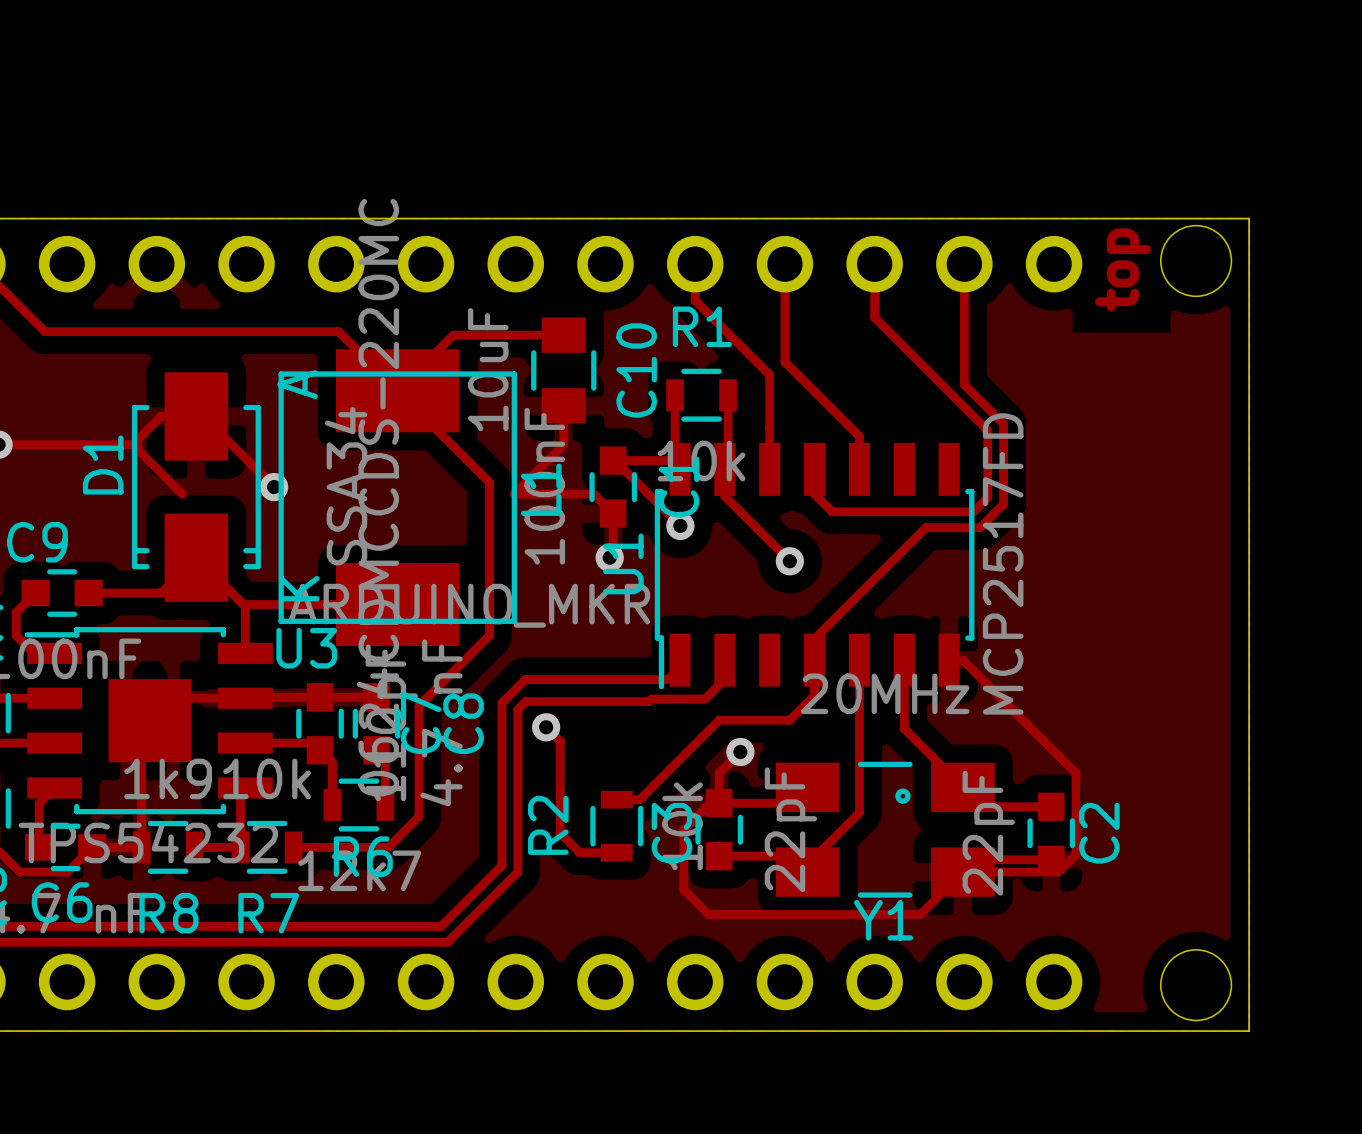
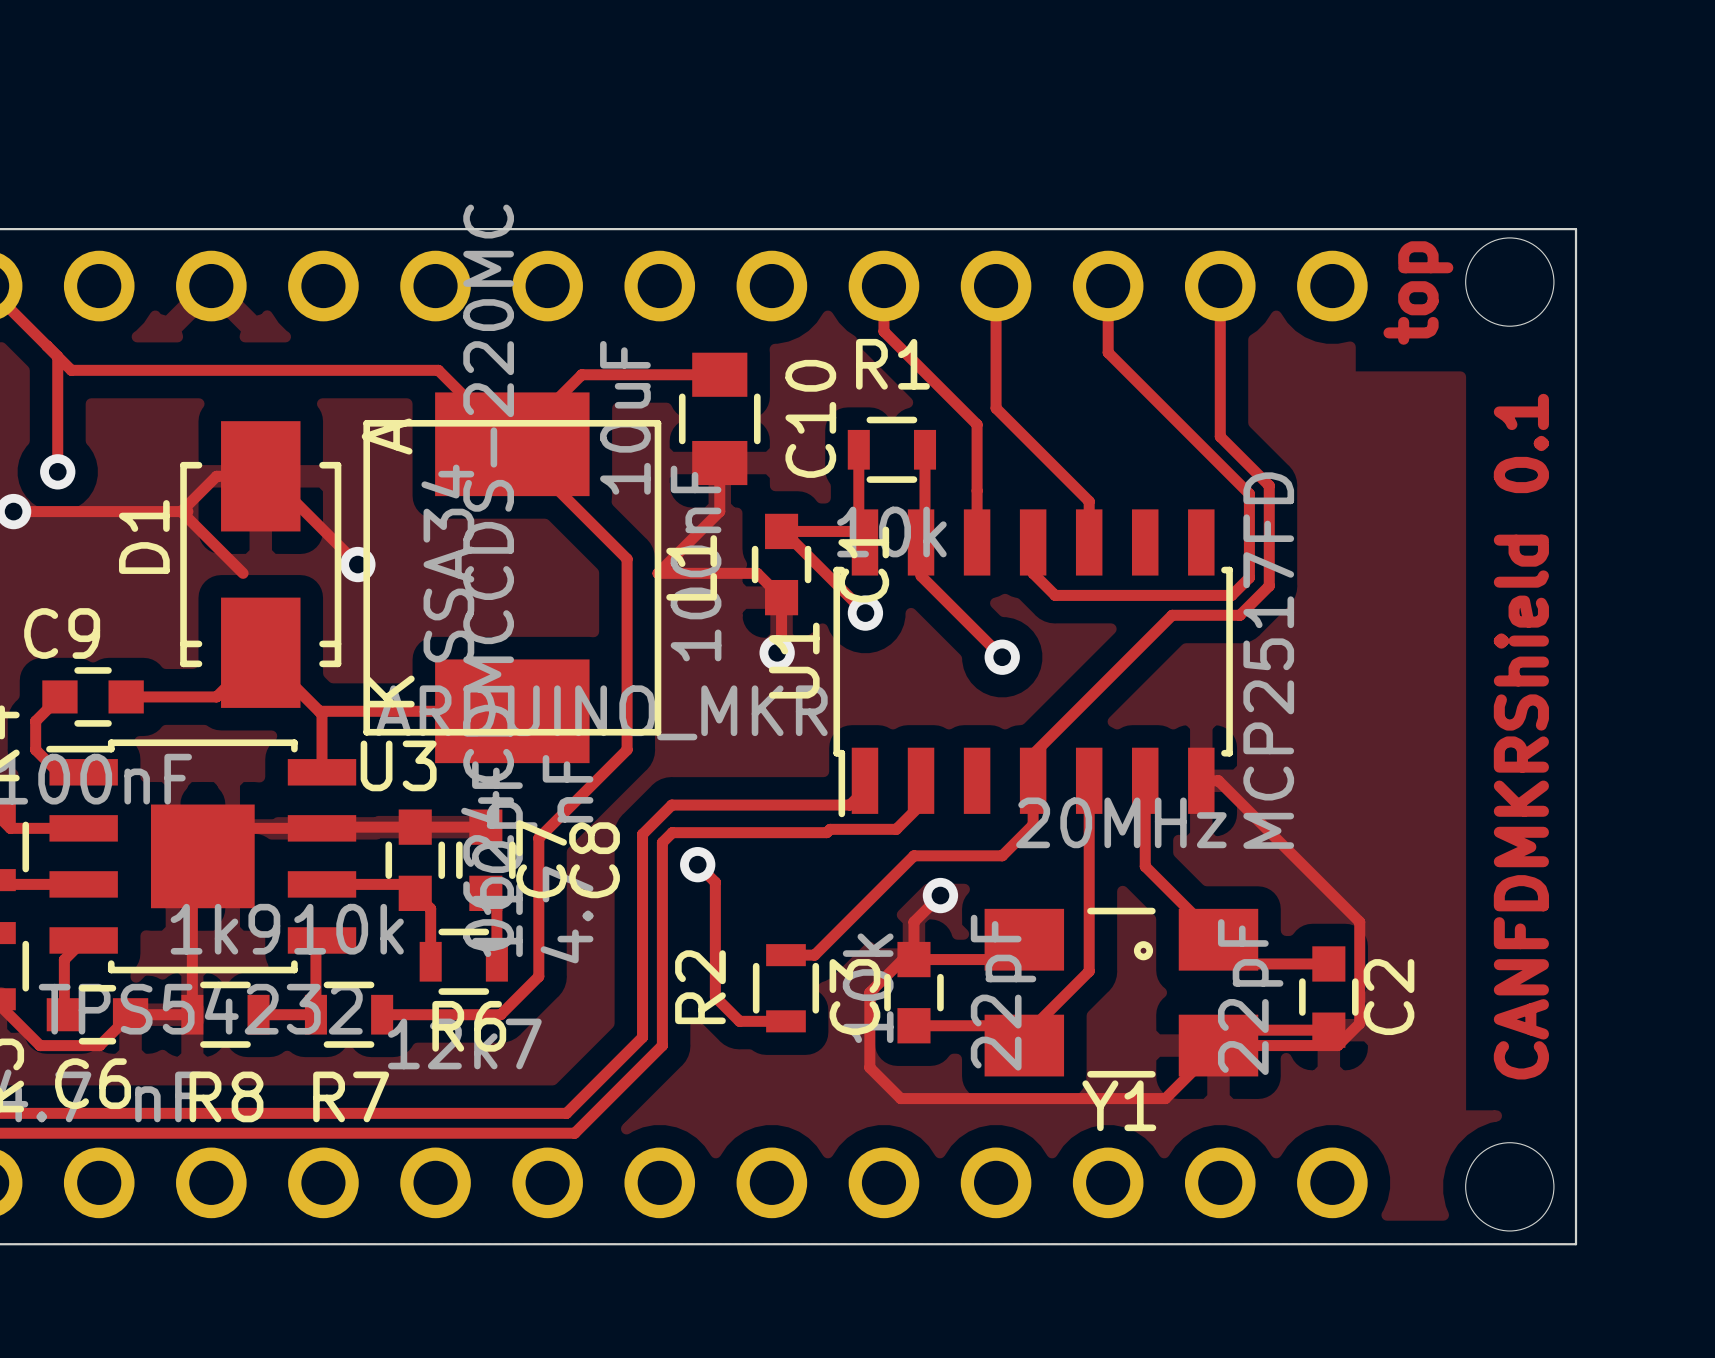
track: none -> (57, 356) (57, 471)
via: none -> (57, 471)
text: none -> CANFDMKRShield 0.1 (1521, 736)

